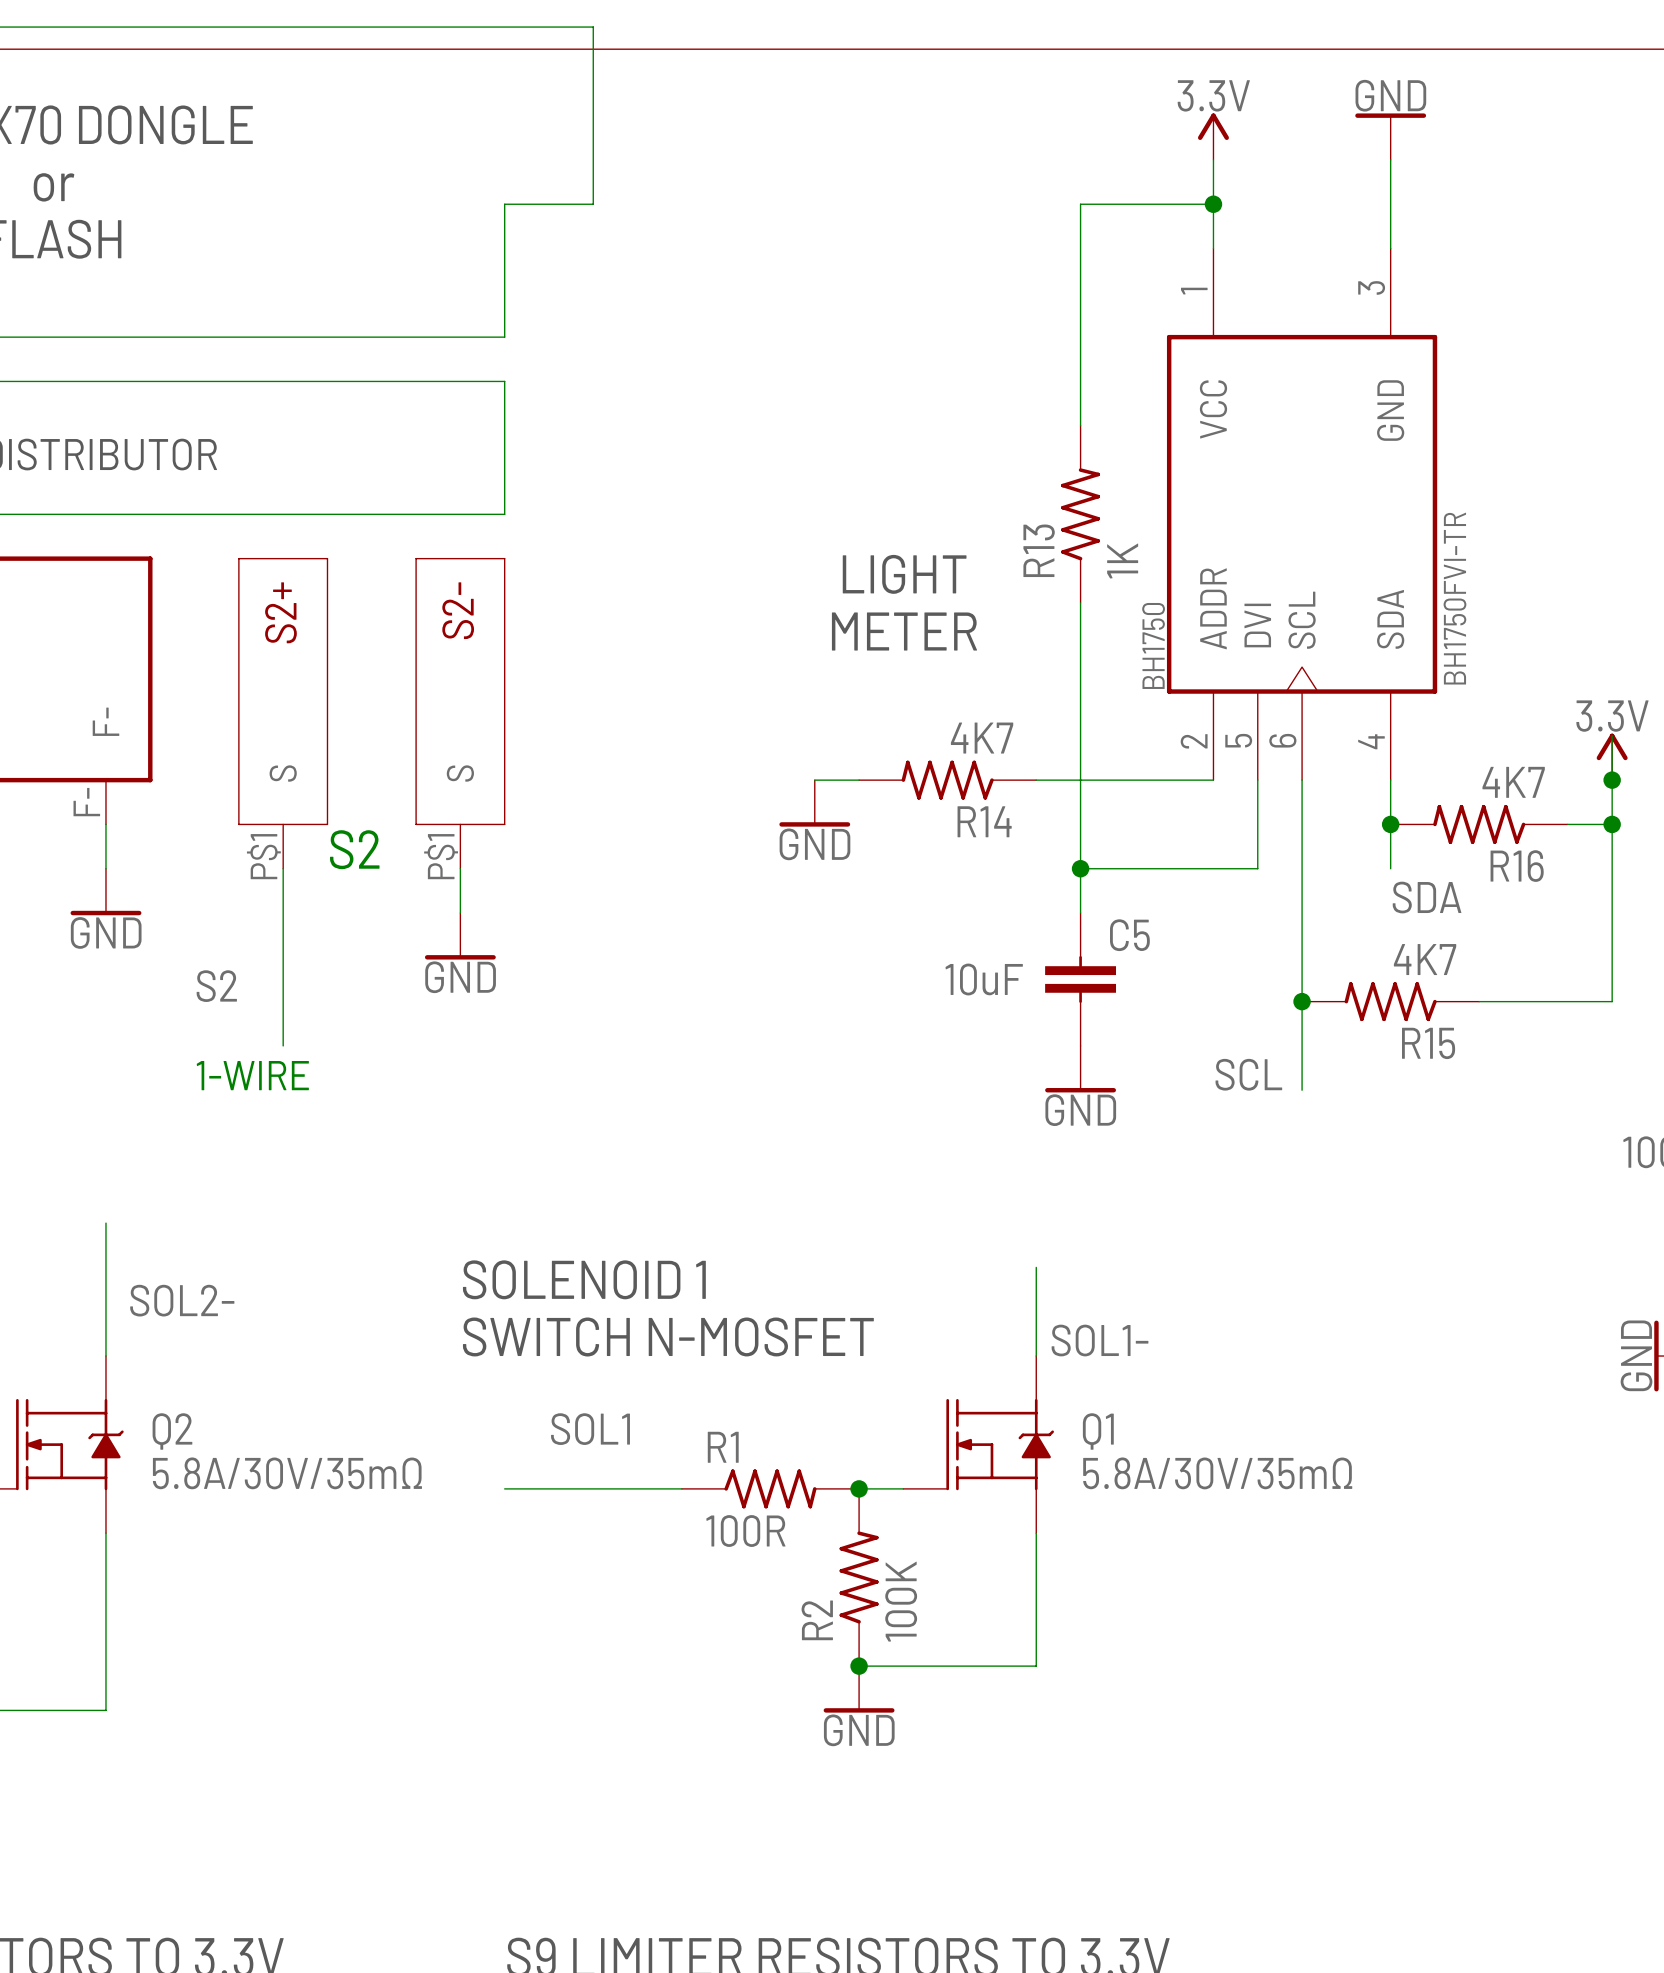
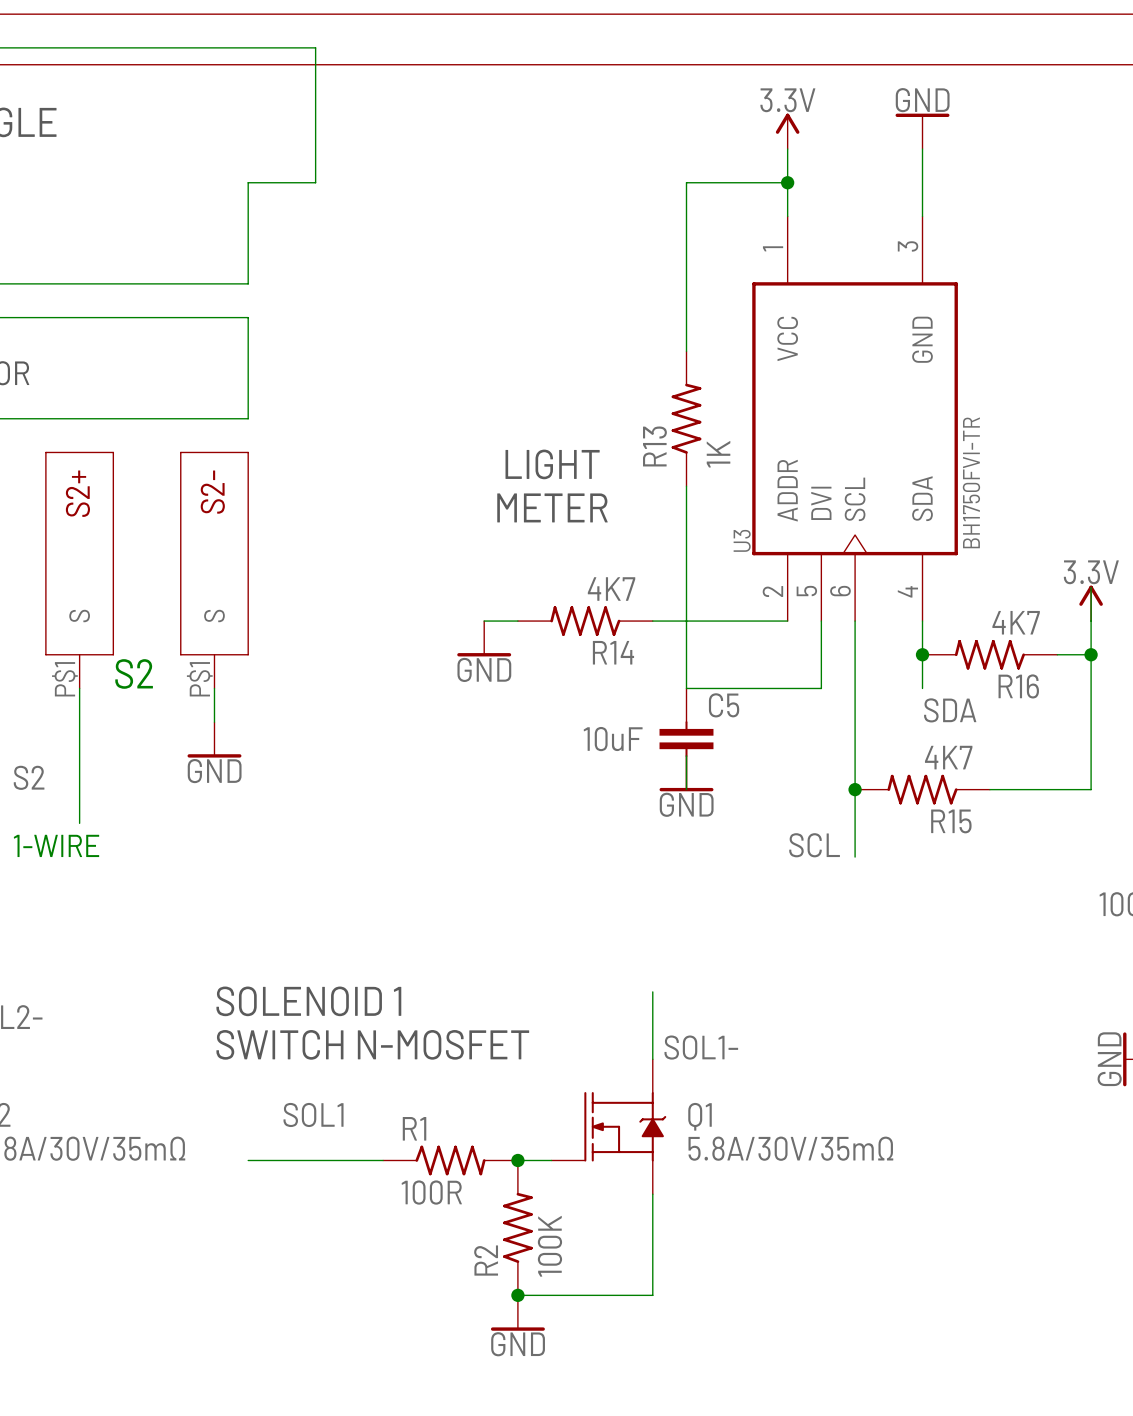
BH1750 name: BH1750 (1153, 645) -> U3 (742, 540)
junction: (1612, 780) -> none
junction: (1080, 868) -> none
C5 position: (1080, 979) -> (686, 739)
power symbol position: GND (1080, 1069) -> GND (686, 773)

